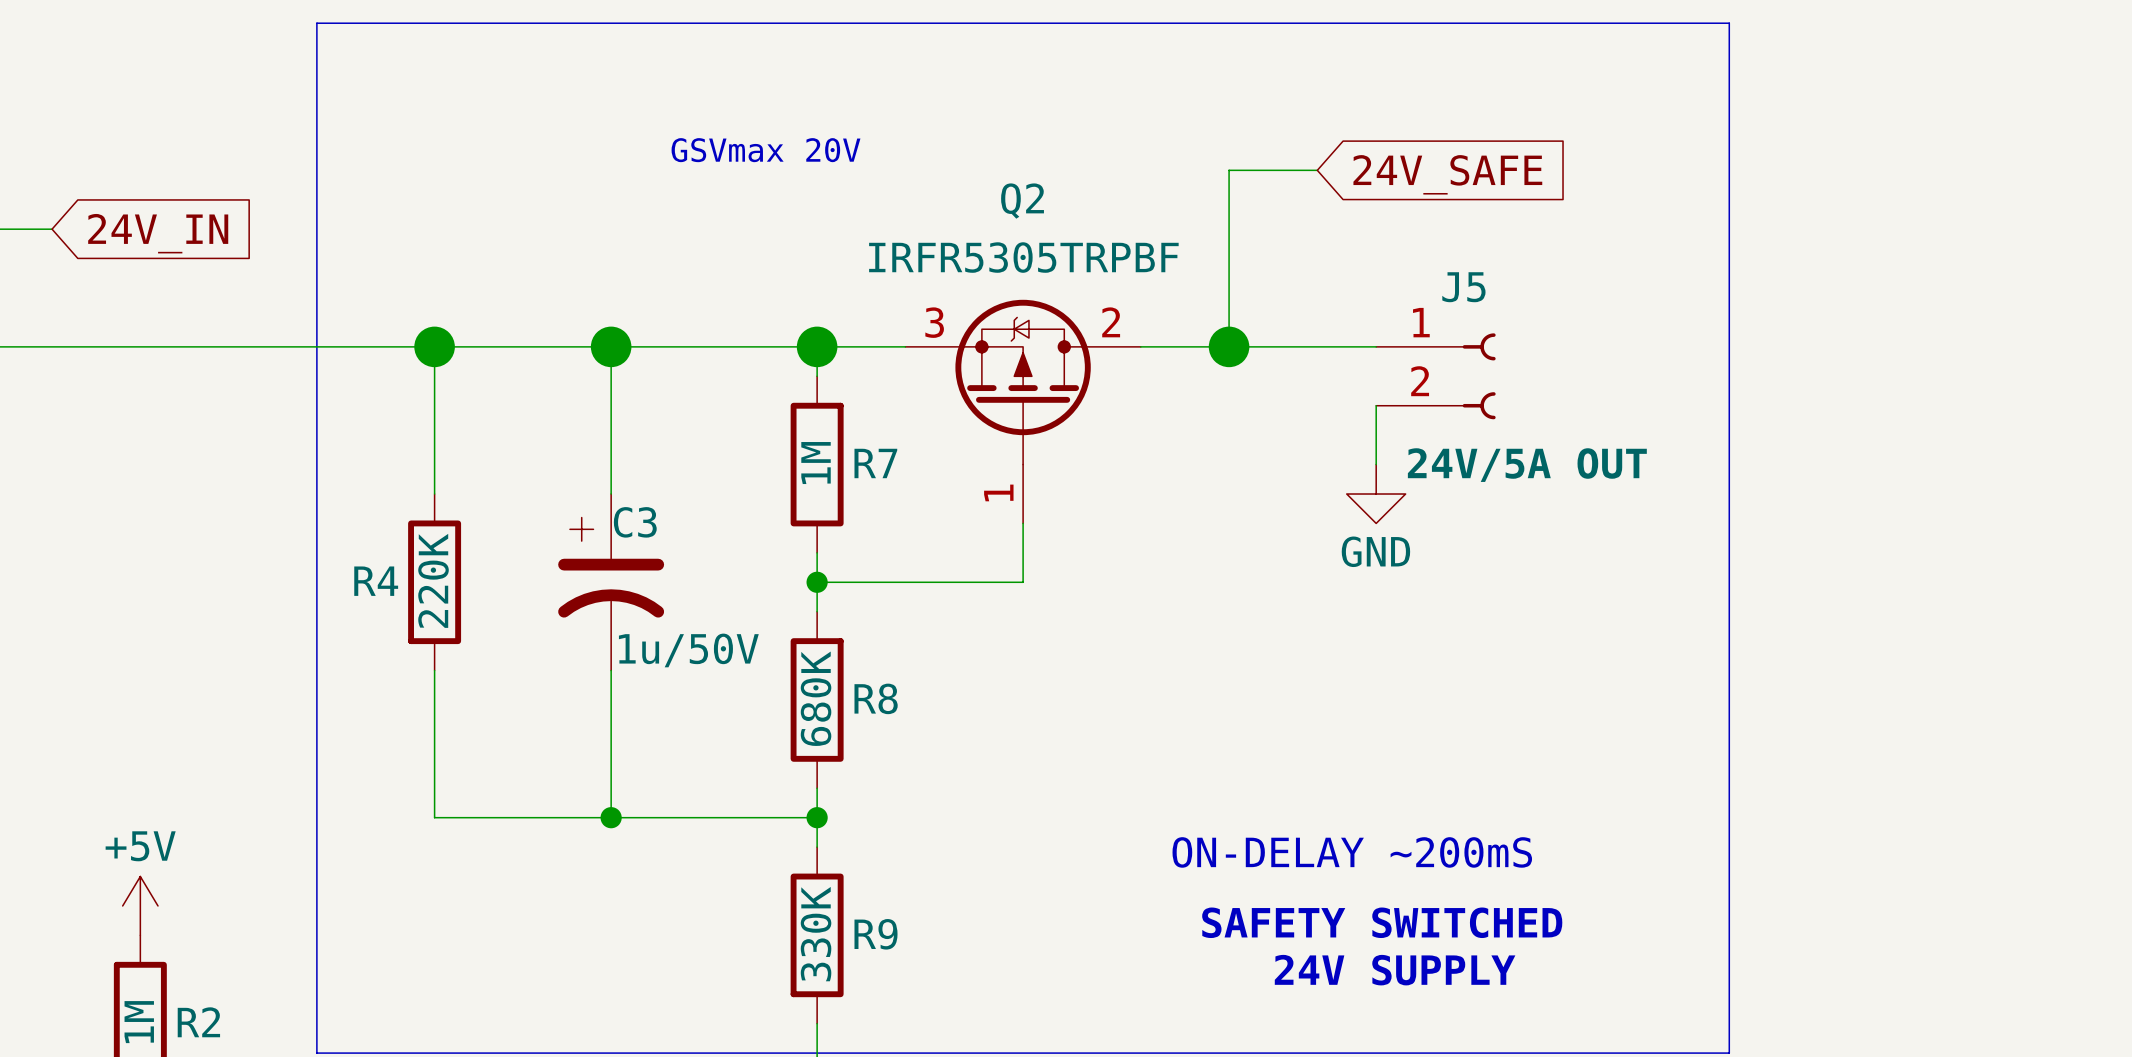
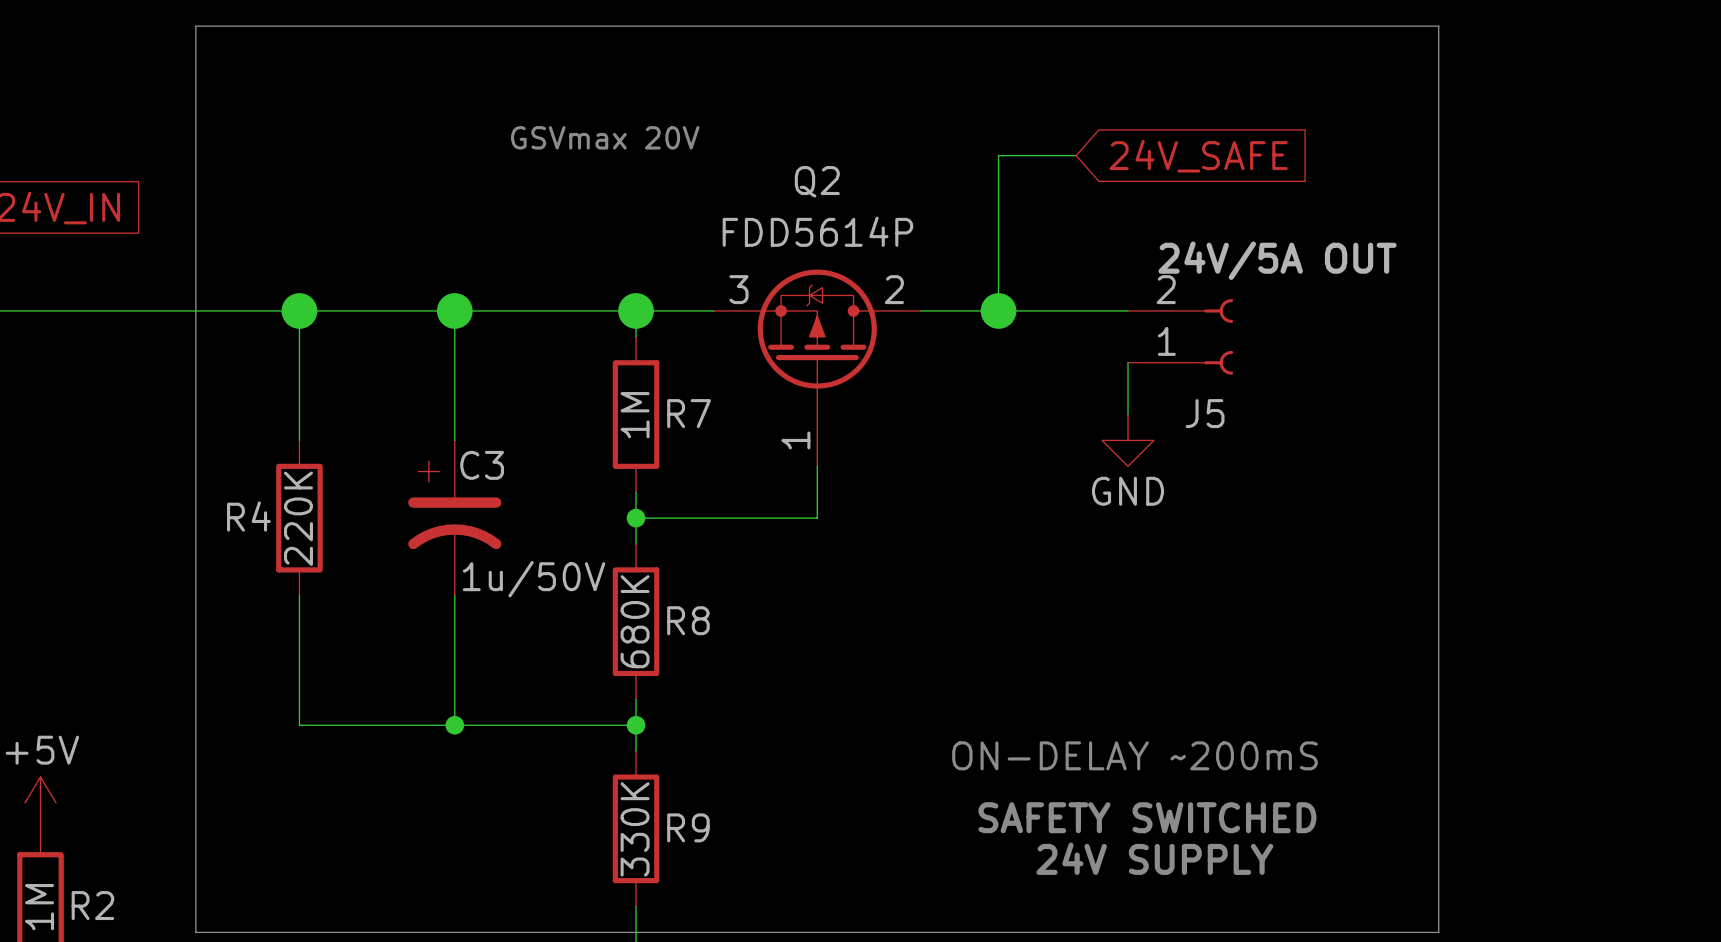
Q2 value: IRFR5305TRPBF (1023, 257) -> FDD5614P (817, 231)
J5 flip: as is (1479, 376) -> up-down (1218, 336)

